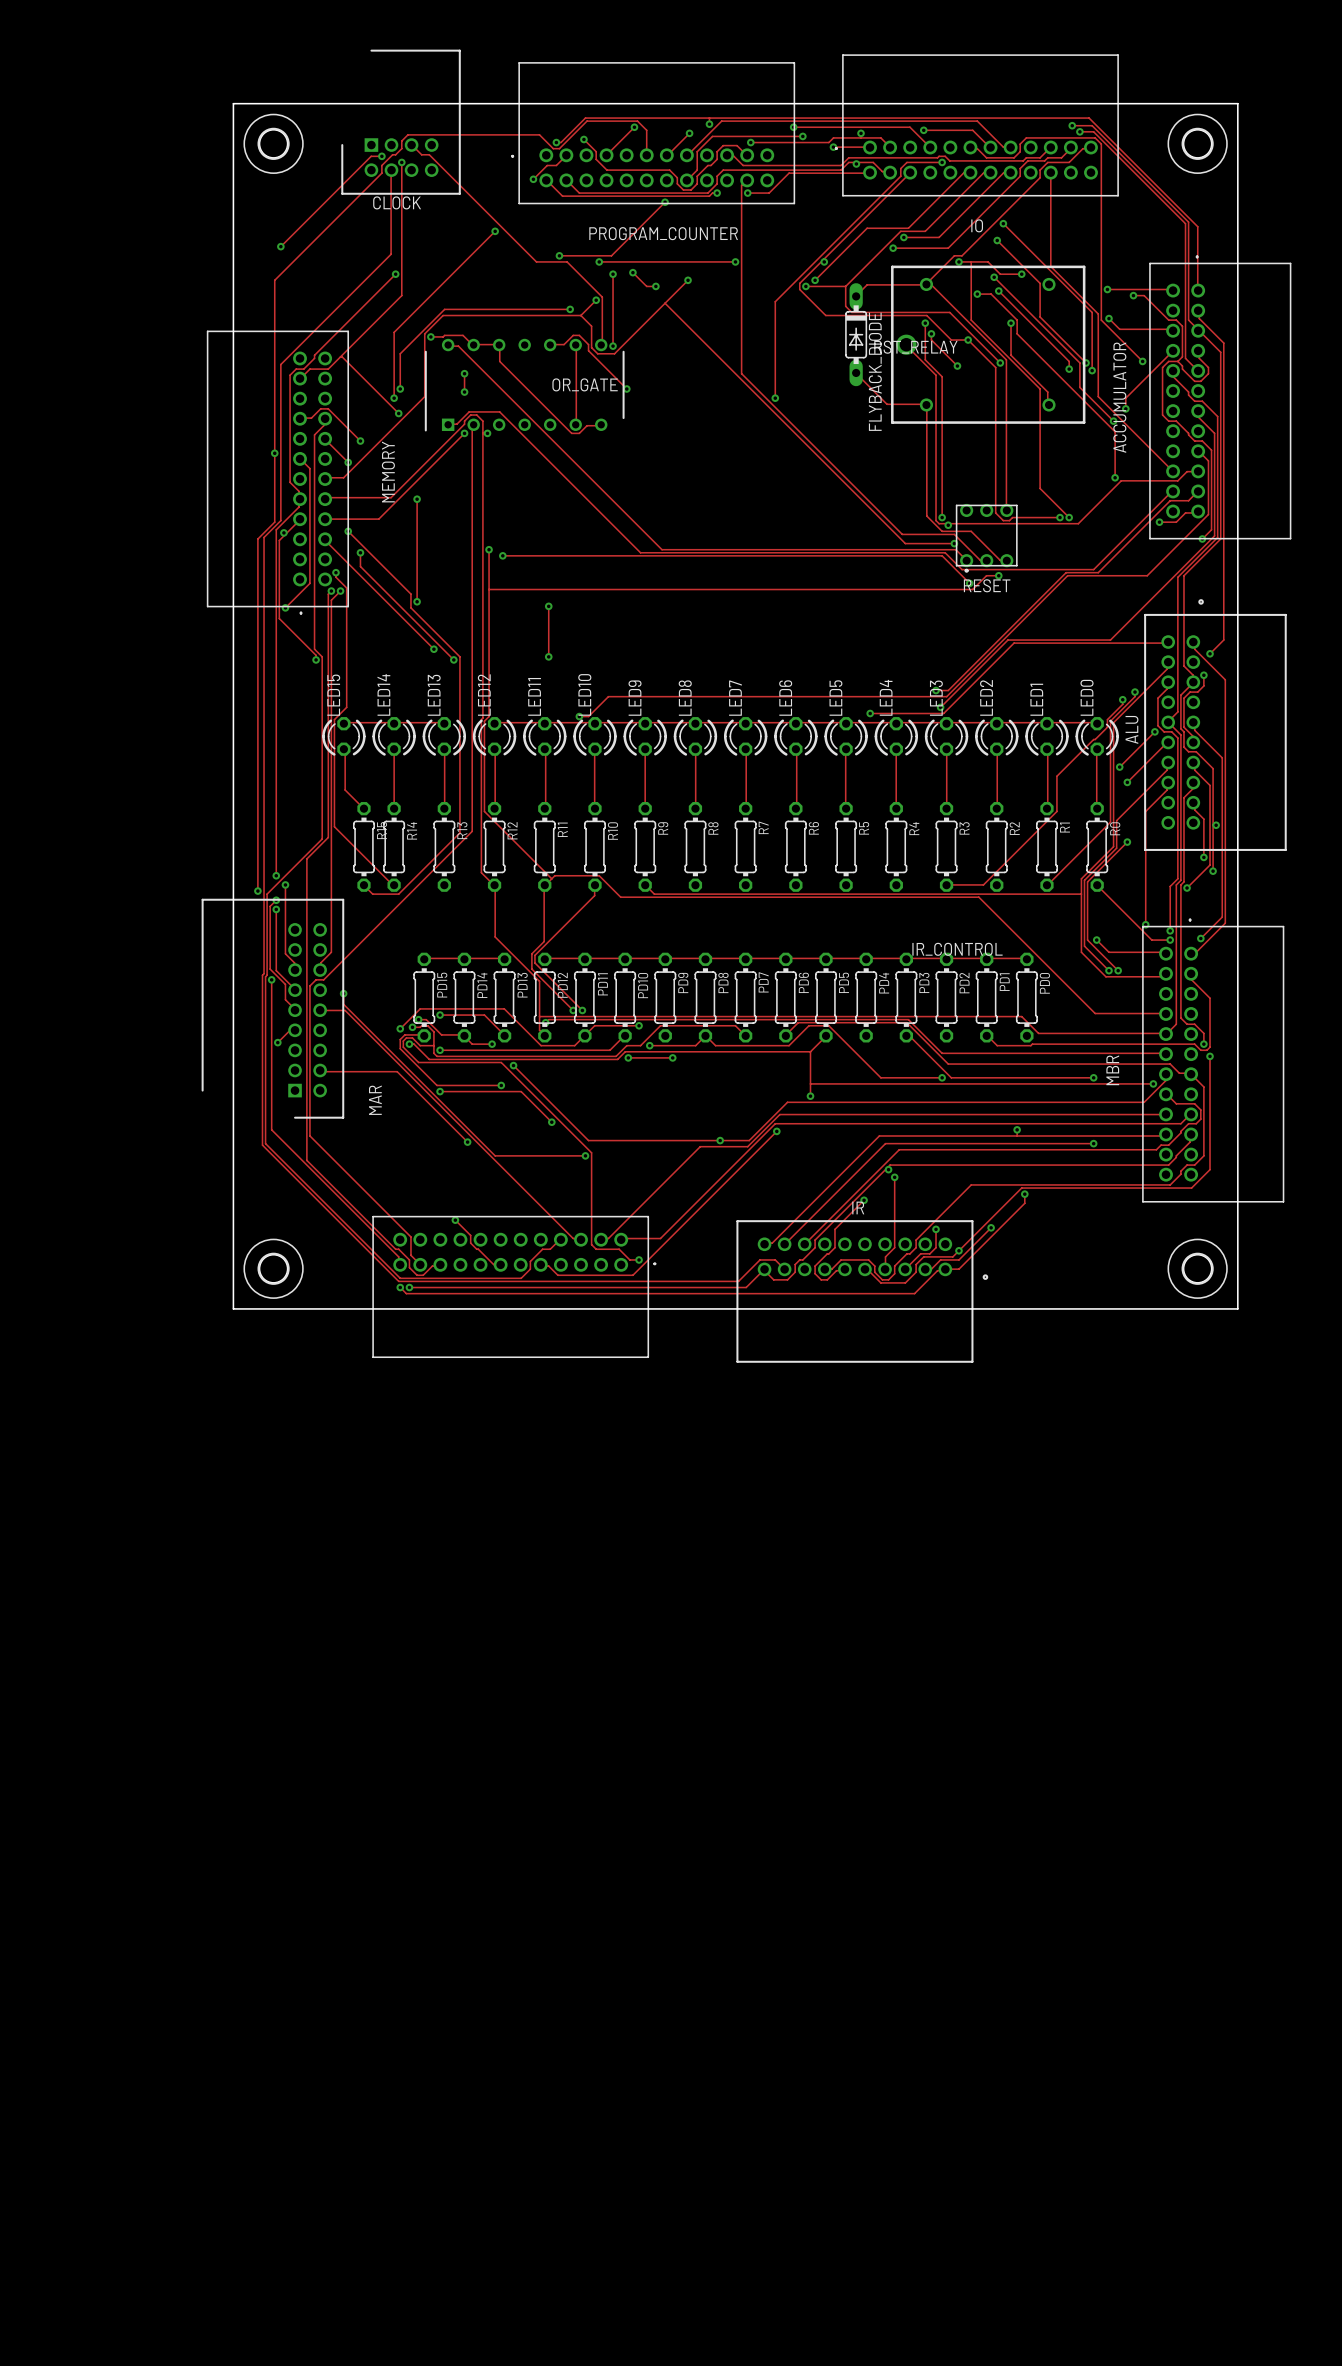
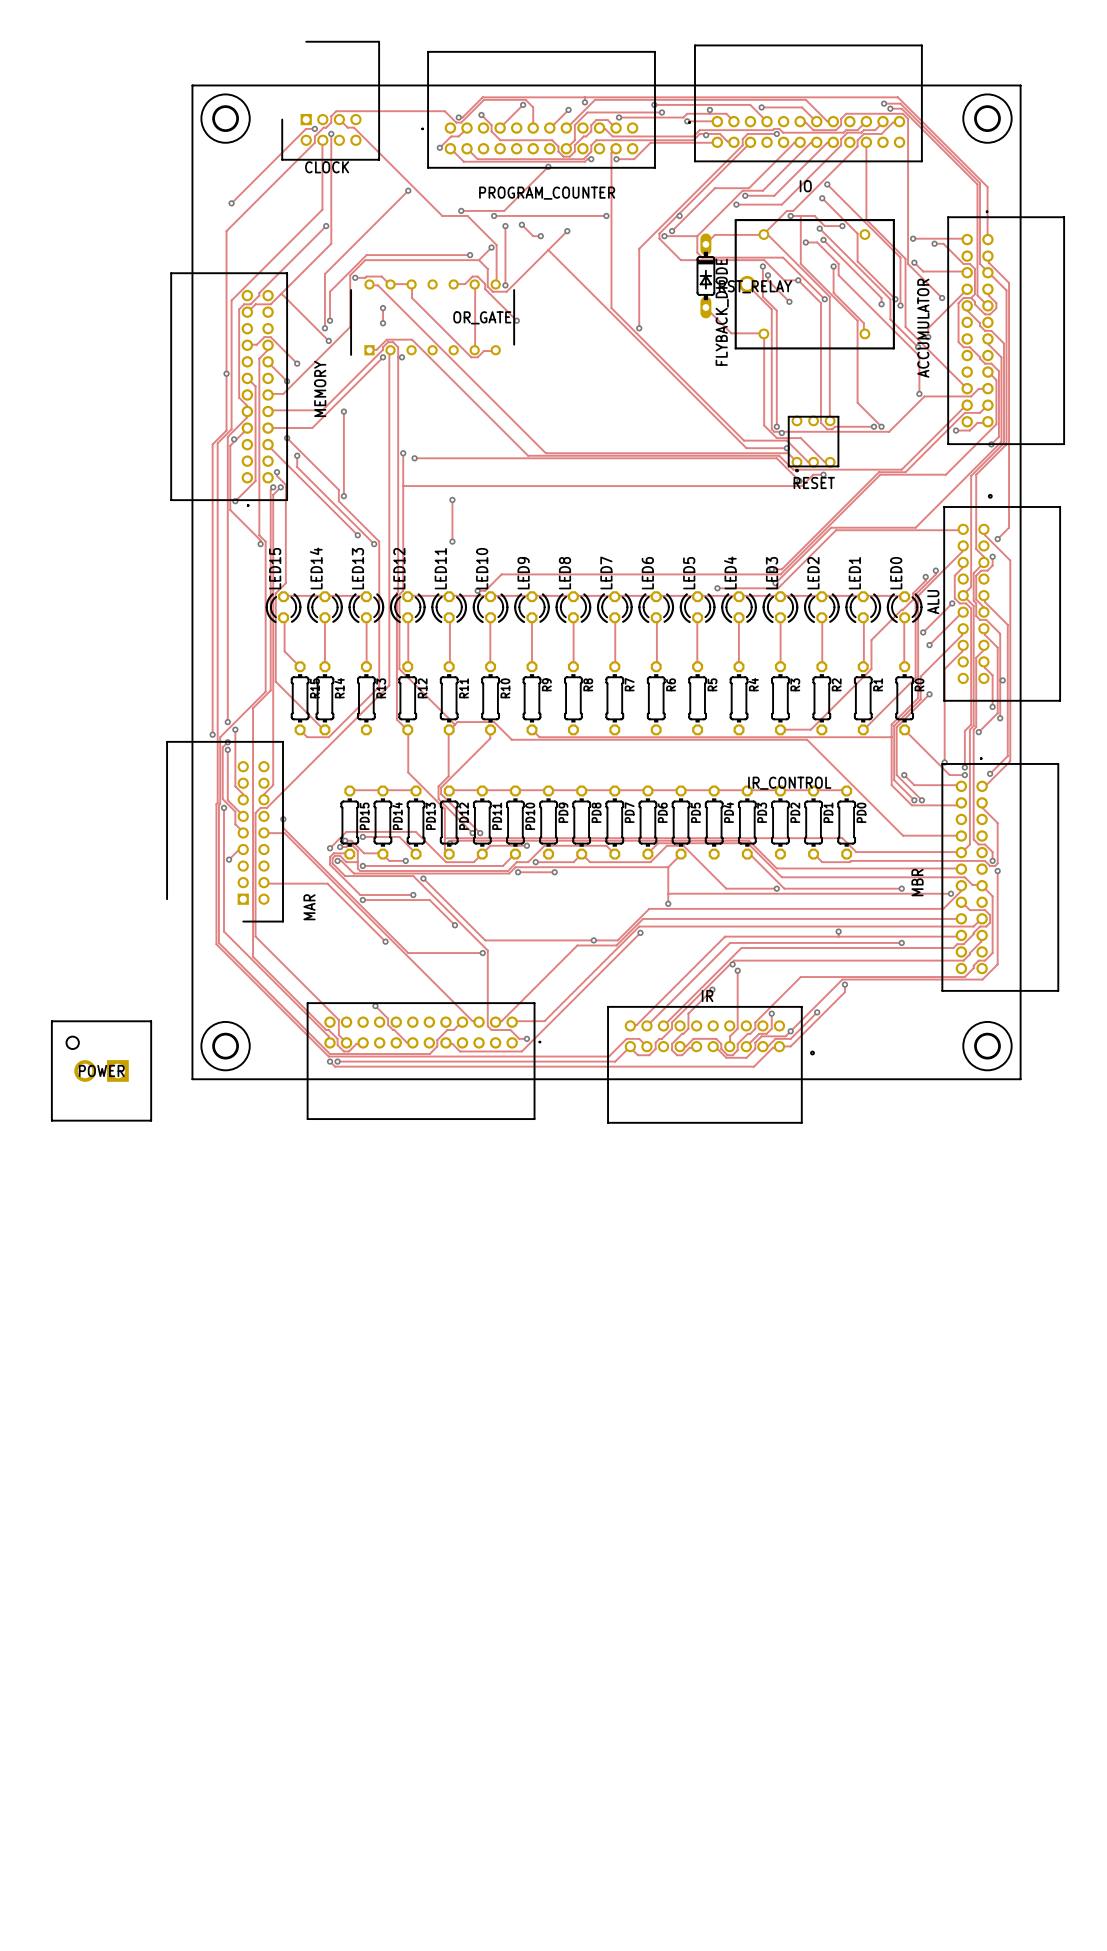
POWER: none -> (101, 1070)

